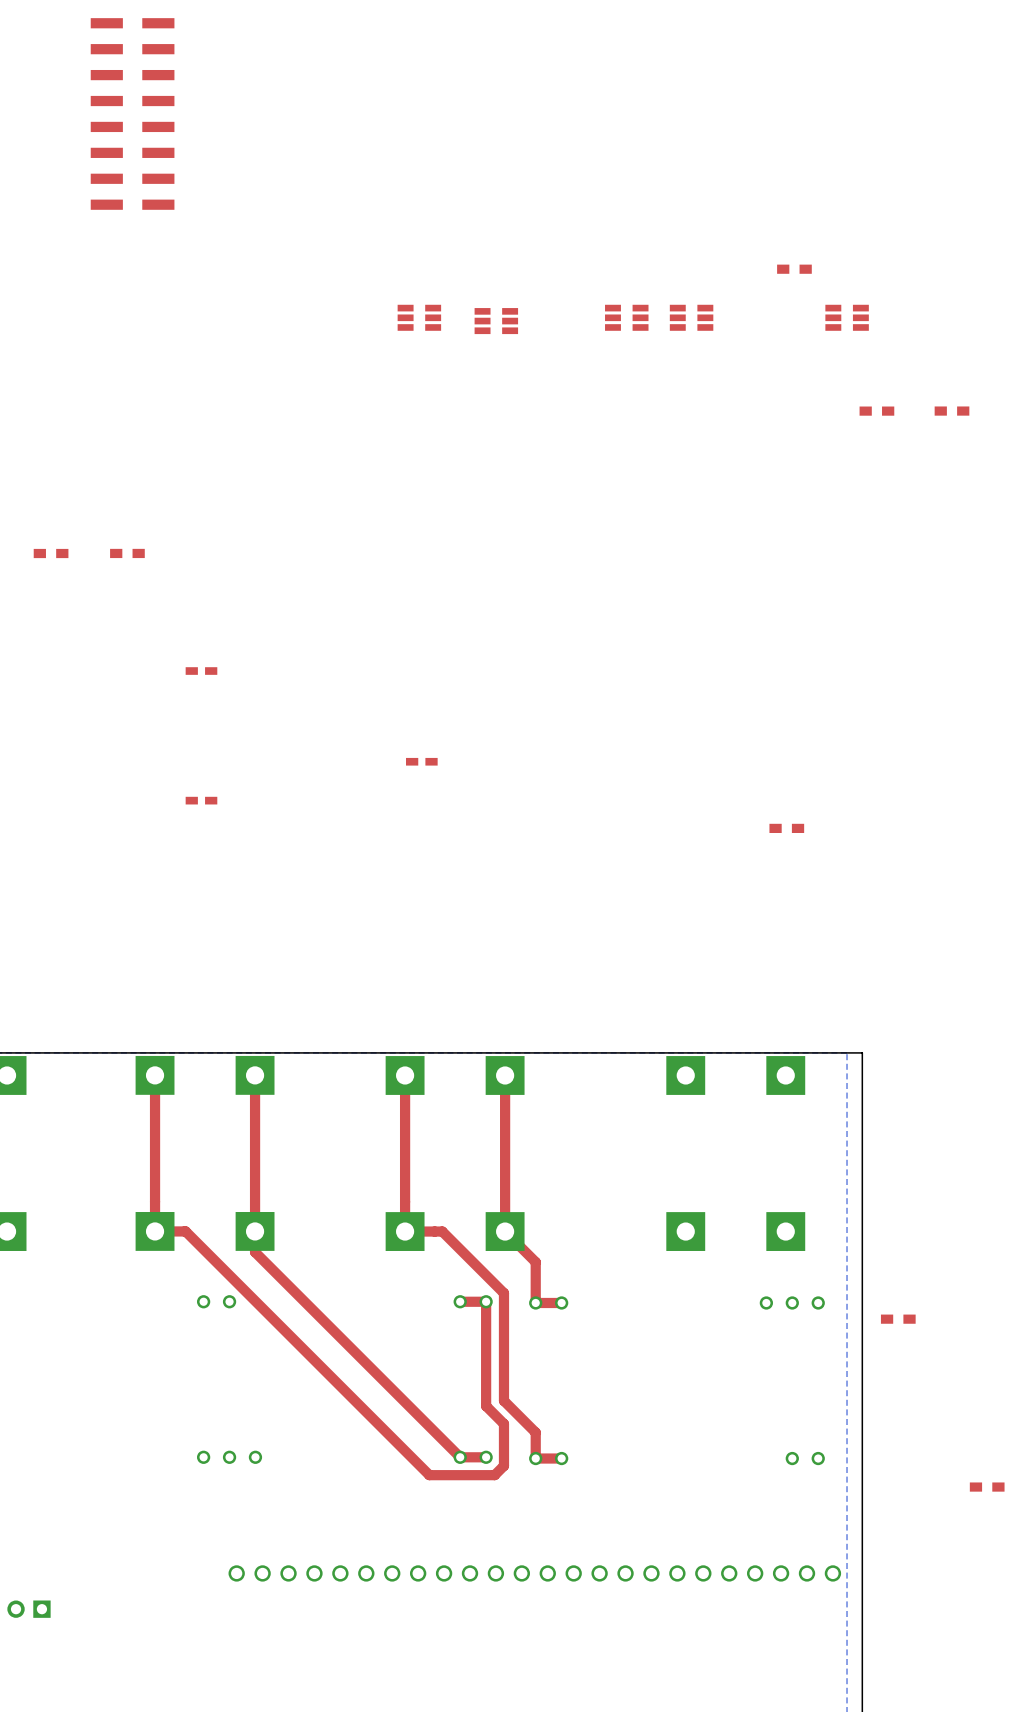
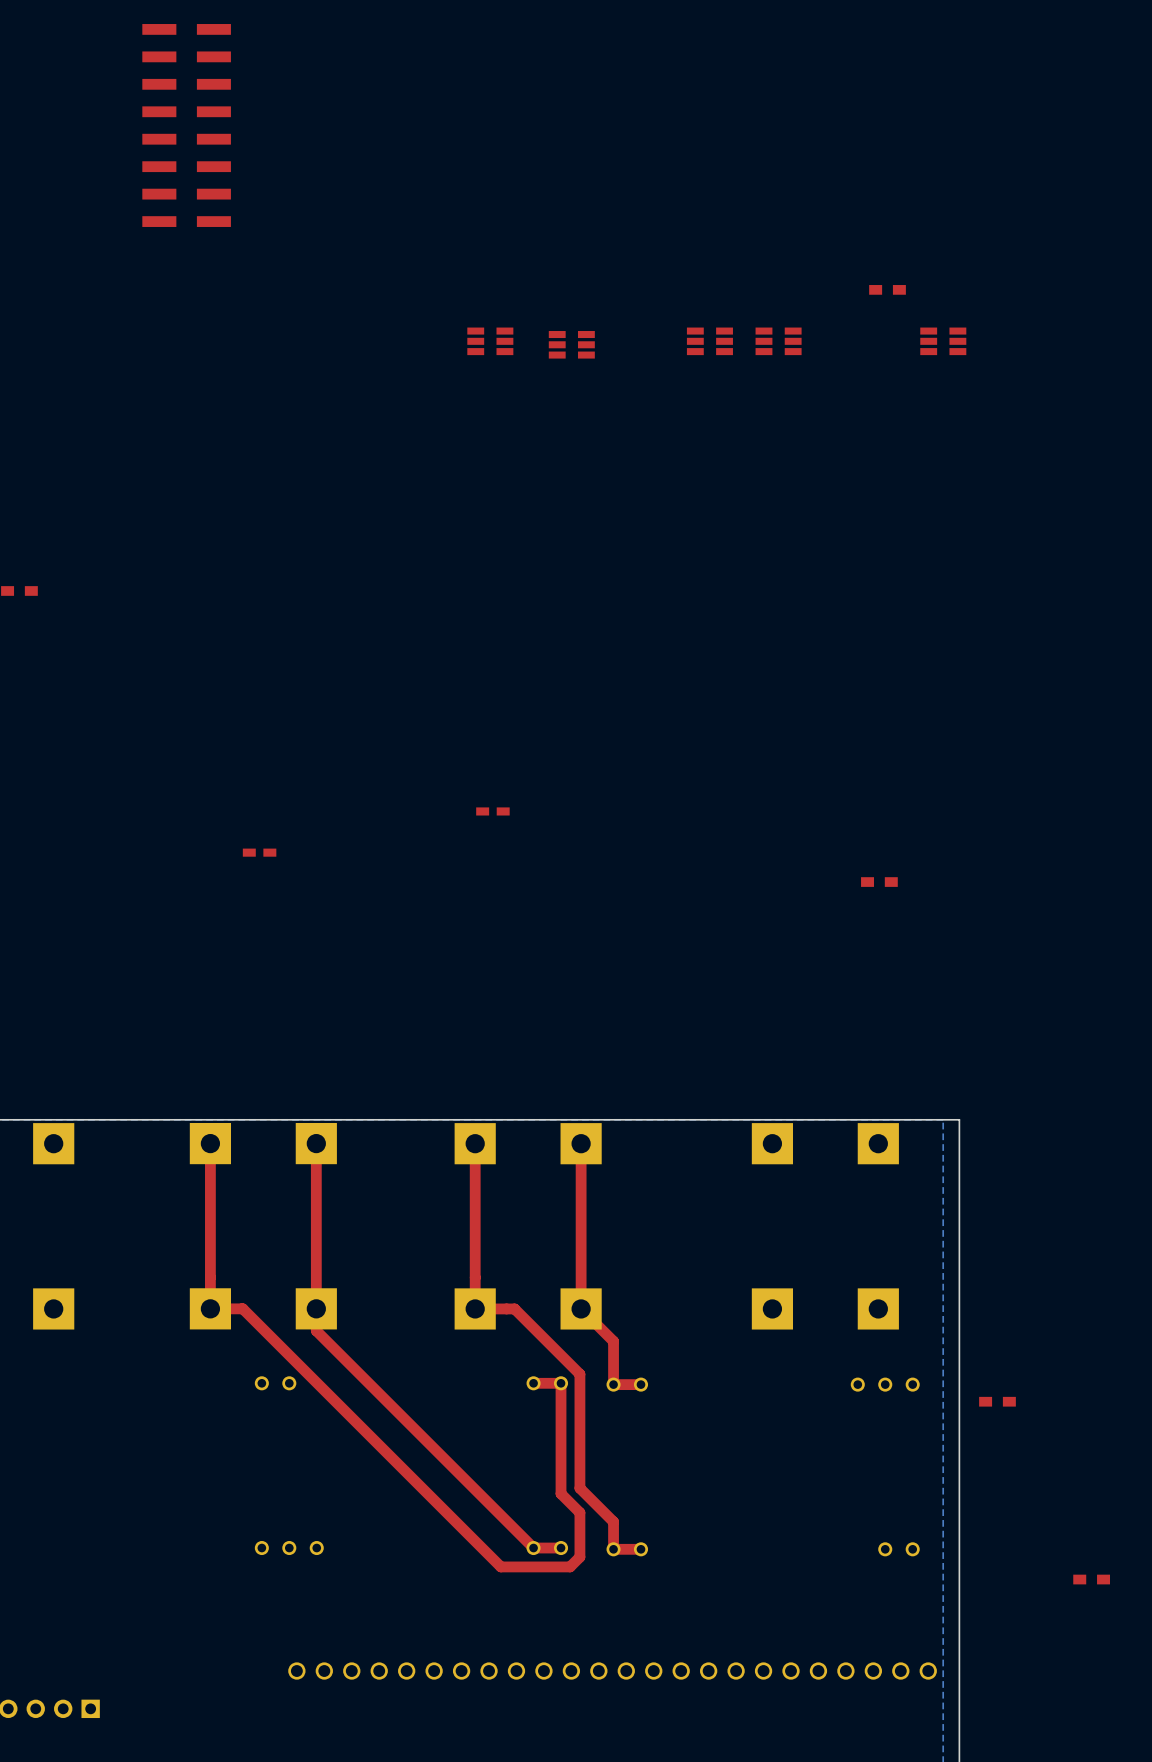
part: (876, 411) -> none
part: (952, 411) -> none
part: (51, 553) -> none
part: (127, 553) -> none
part: (201, 671) -> none

